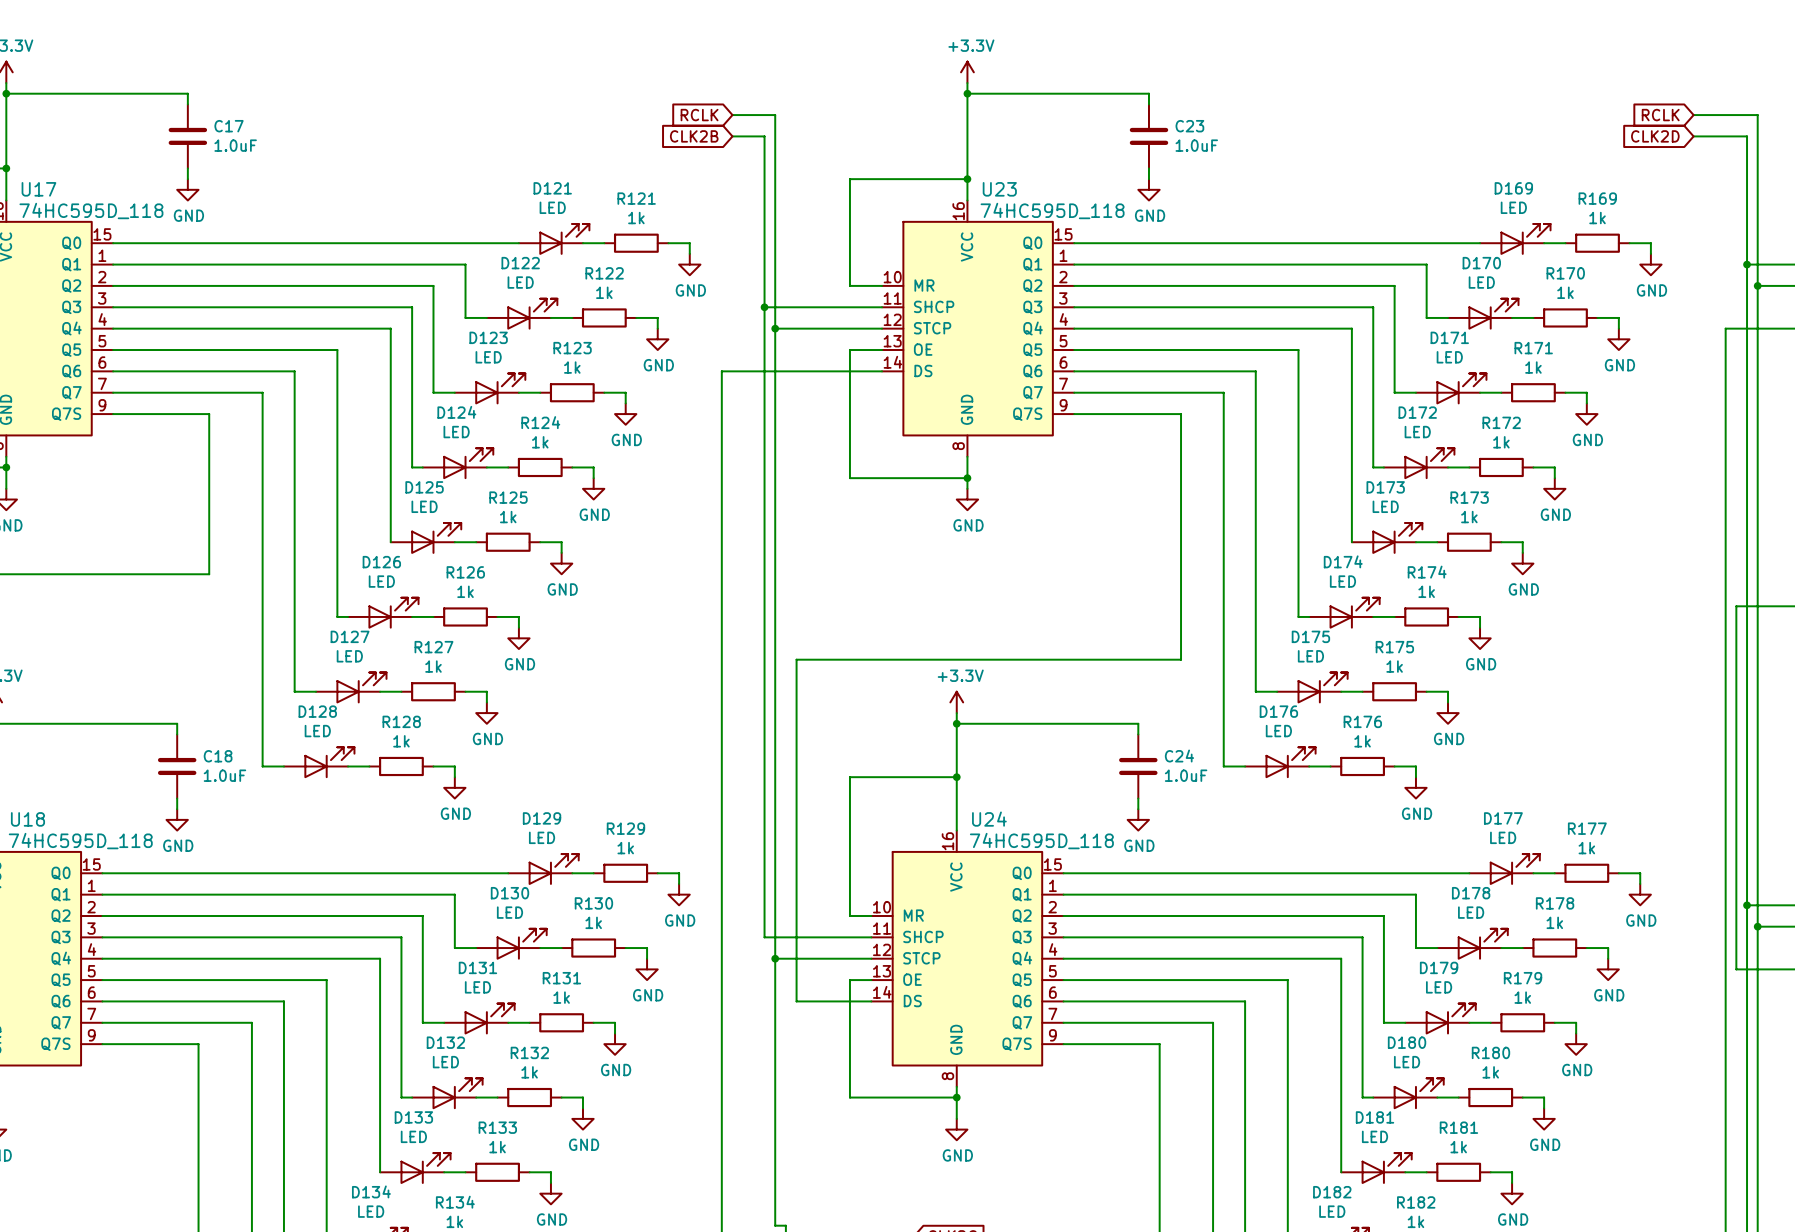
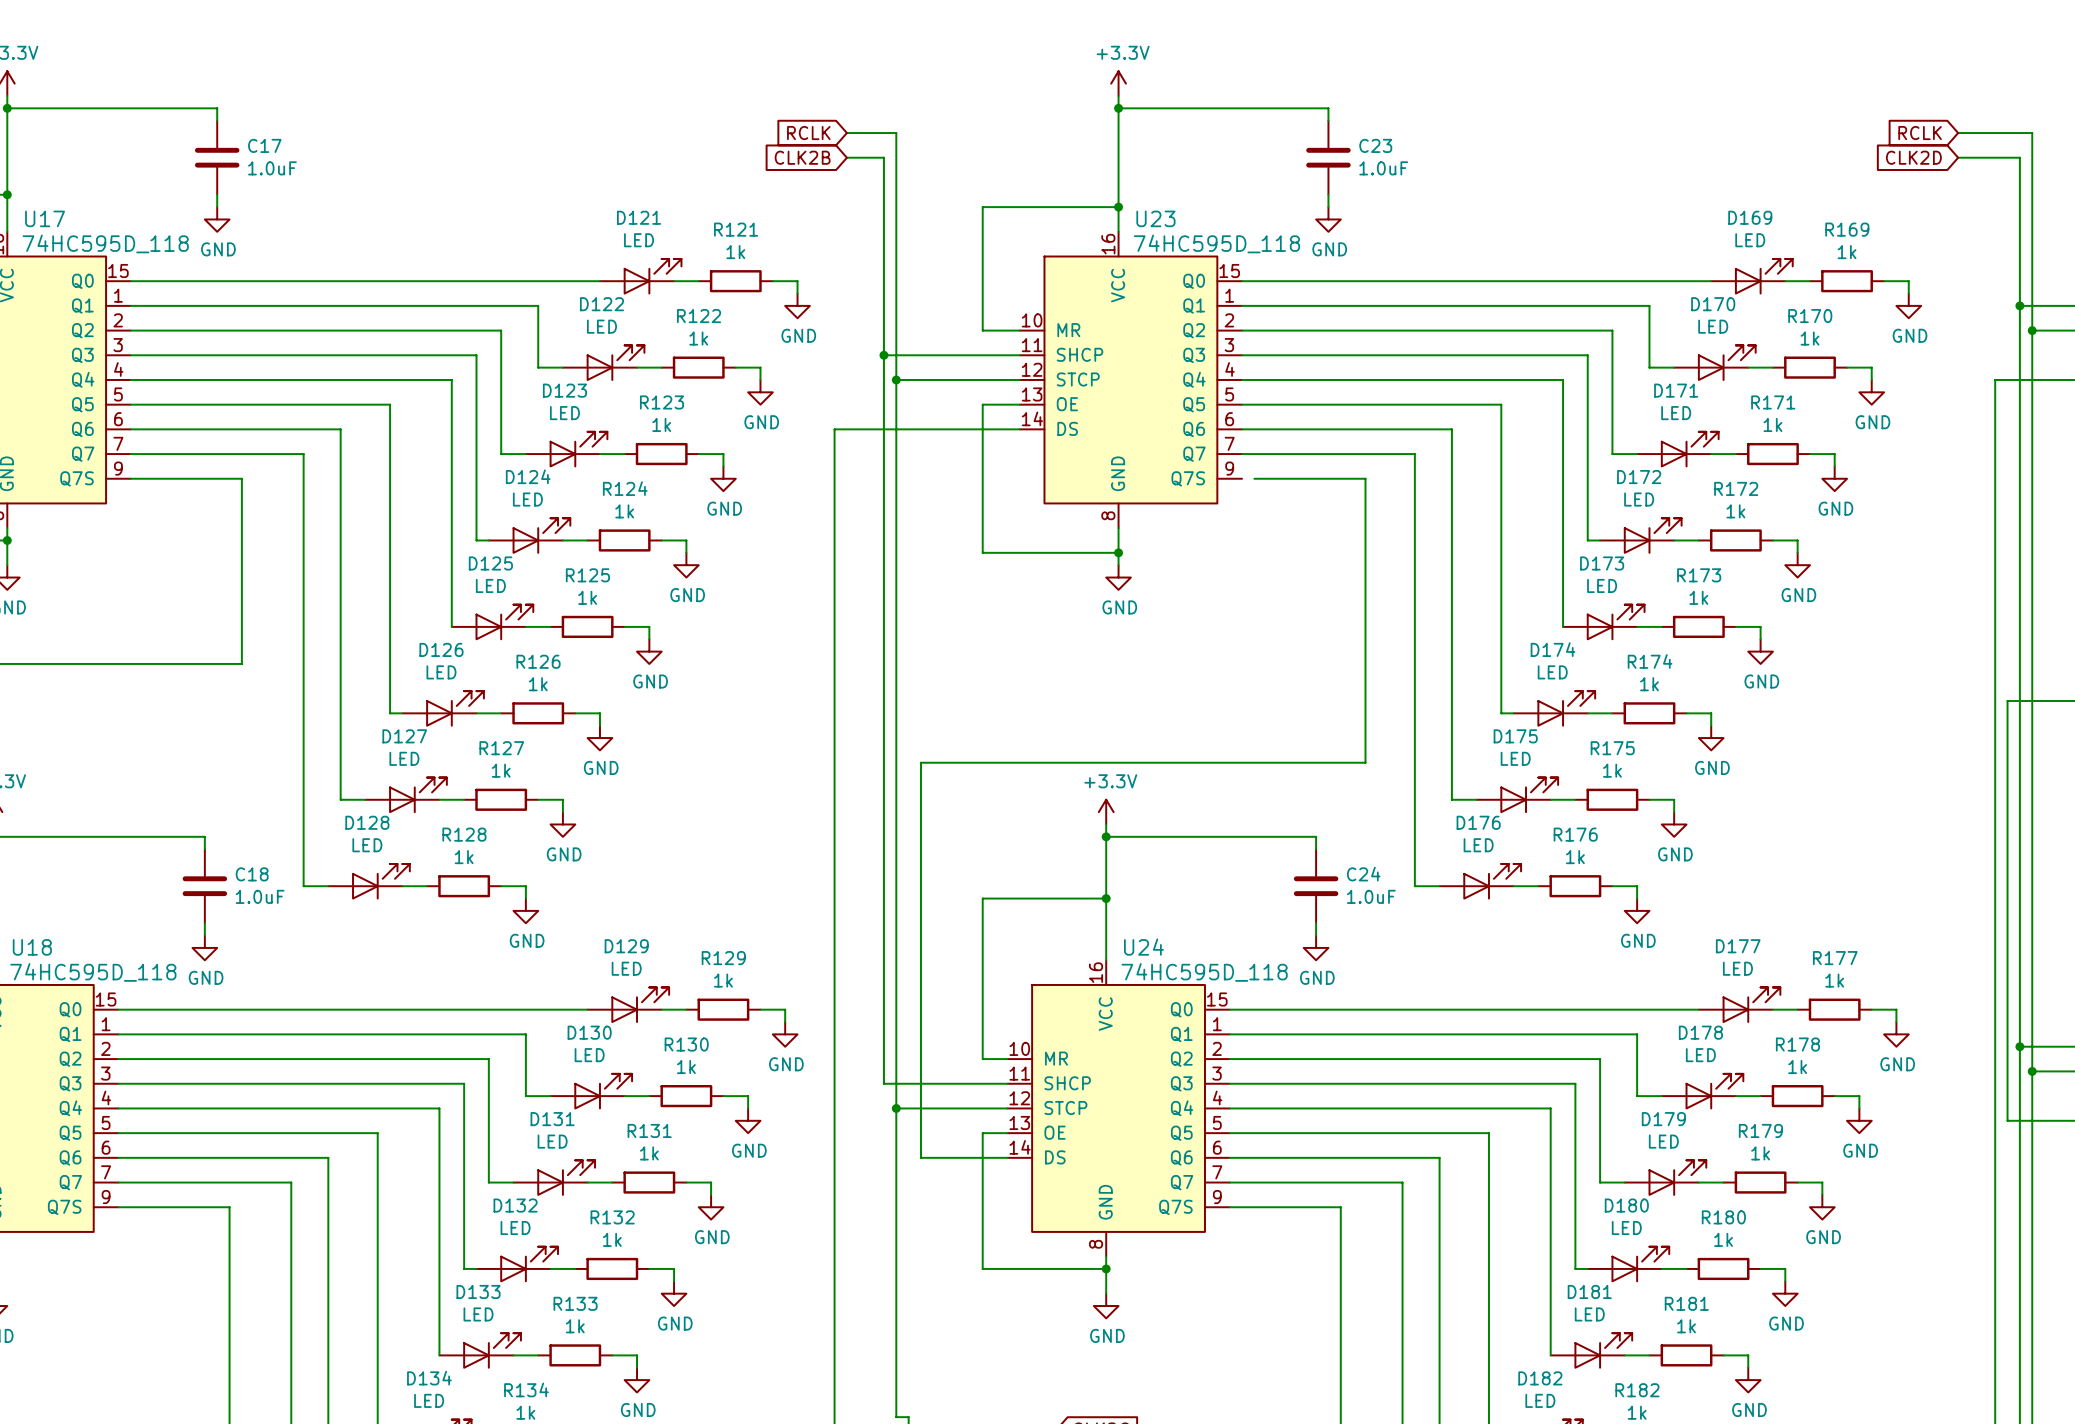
wire: (1074, 414) (1084, 414) -> none

